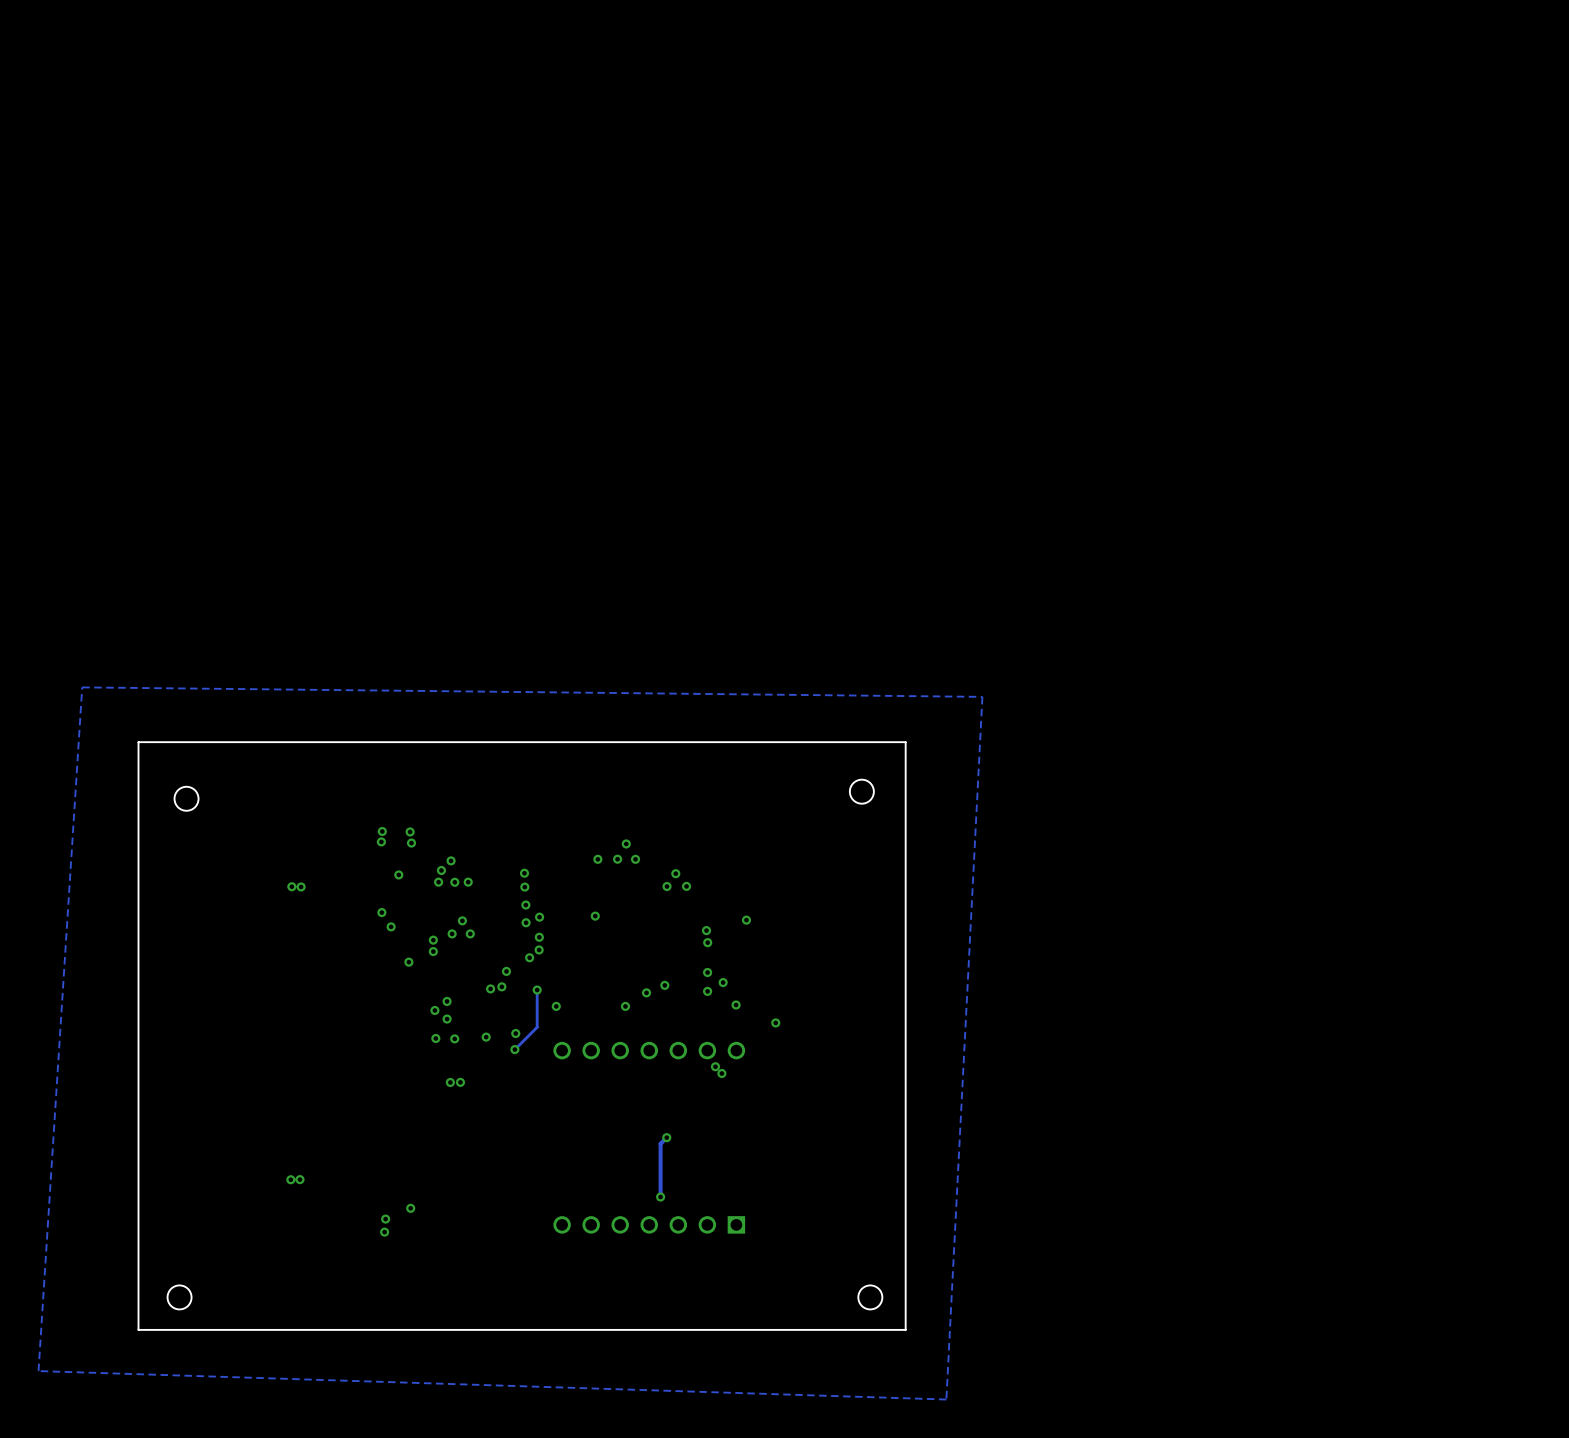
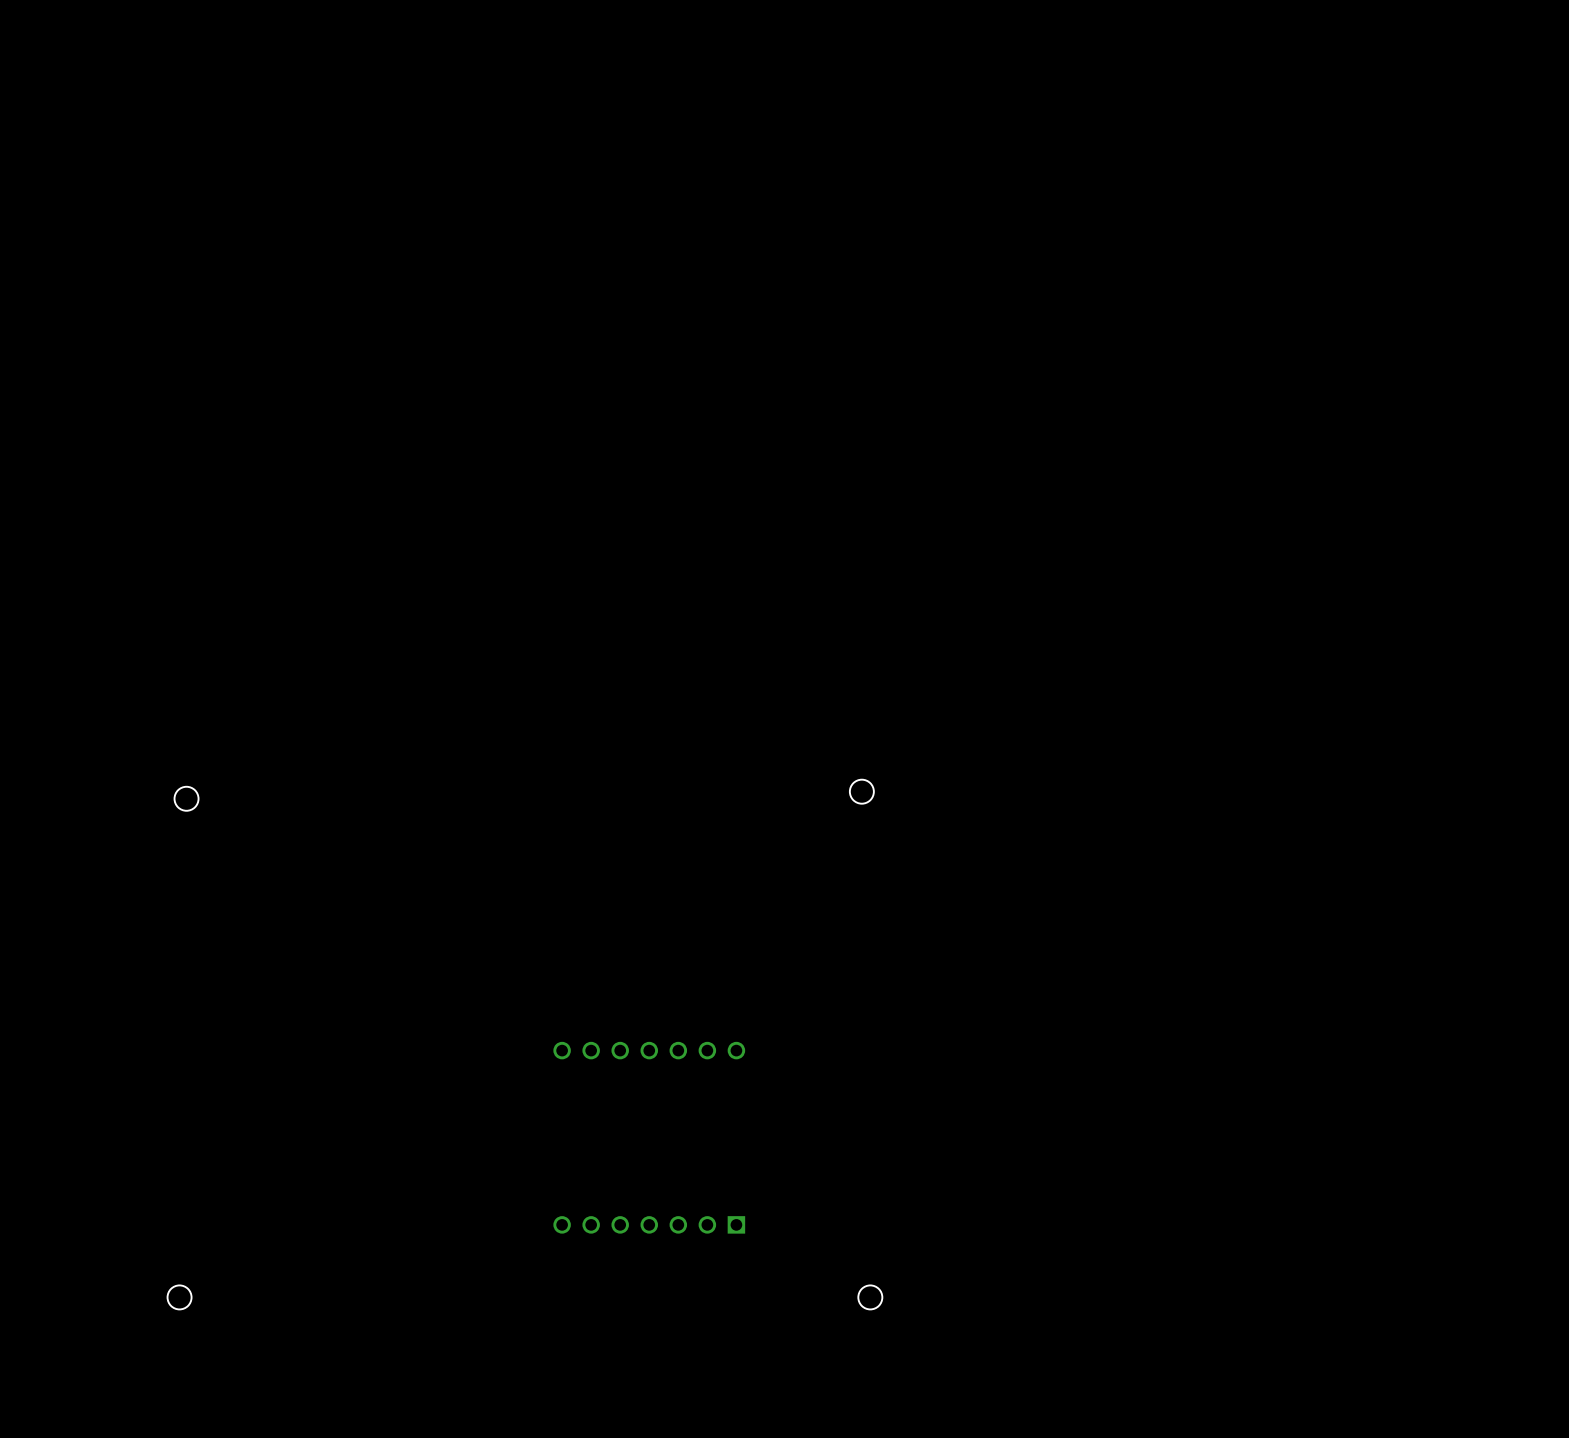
zone outline: (82, 687) (982, 696) (946, 1399) (38, 1371) (82, 687) -> none
board edge: (905, 742) (138, 742) (138, 1329) (905, 1329) (905, 742) -> none
via: (382, 831) -> none
via: (410, 831) -> none
via: (381, 841) -> none
via: (411, 843) -> none
via: (626, 843) -> none
via: (597, 859) -> none
via: (617, 859) -> none
via: (635, 859) -> none
via: (451, 860) -> none
via: (441, 870) -> none
via: (524, 873) -> none
via: (675, 873) -> none
via: (398, 874) -> none
via: (438, 882) -> none
via: (454, 882) -> none
via: (468, 882) -> none
via: (291, 886) -> none
via: (301, 886) -> none
via: (666, 886) -> none
via: (686, 886) -> none
via: (524, 887) -> none
via: (525, 905) -> none
via: (381, 912) -> none
via: (595, 916) -> none
via: (539, 917) -> none
via: (462, 920) -> none
via: (746, 920) -> none
via: (526, 922) -> none
via: (391, 926) -> none
via: (706, 930) -> none
via: (452, 933) -> none
via: (470, 933) -> none
via: (539, 937) -> none
via: (433, 940) -> none
via: (707, 942) -> none
via: (539, 949) -> none
via: (433, 951) -> none
via: (529, 957) -> none
via: (408, 962) -> none
via: (506, 971) -> none
via: (707, 972) -> none
via: (723, 982) -> none
via: (664, 985) -> none
via: (501, 986) -> none
via: (490, 988) -> none
track: (537, 990) (537, 1027) (514, 1049) -> none
via: (537, 990) -> none
via: (707, 991) -> none
via: (646, 992) -> none
via: (447, 1001) -> none
via: (736, 1005) -> none
via: (556, 1006) -> none
via: (625, 1006) -> none
via: (434, 1010) -> none
via: (447, 1019) -> none
via: (775, 1022) -> none
via: (515, 1033) -> none
via: (486, 1037) -> none
via: (435, 1038) -> none
via: (454, 1038) -> none
via: (514, 1049) -> none
via: (715, 1066) -> none
via: (721, 1073) -> none
via: (450, 1082) -> none
via: (460, 1082) -> none
track: (666, 1137) (660, 1143) (660, 1197) -> none
via: (666, 1137) -> none
via: (290, 1179) -> none
via: (299, 1179) -> none
via: (660, 1197) -> none
via: (410, 1208) -> none
via: (385, 1219) -> none
via: (384, 1232) -> none

